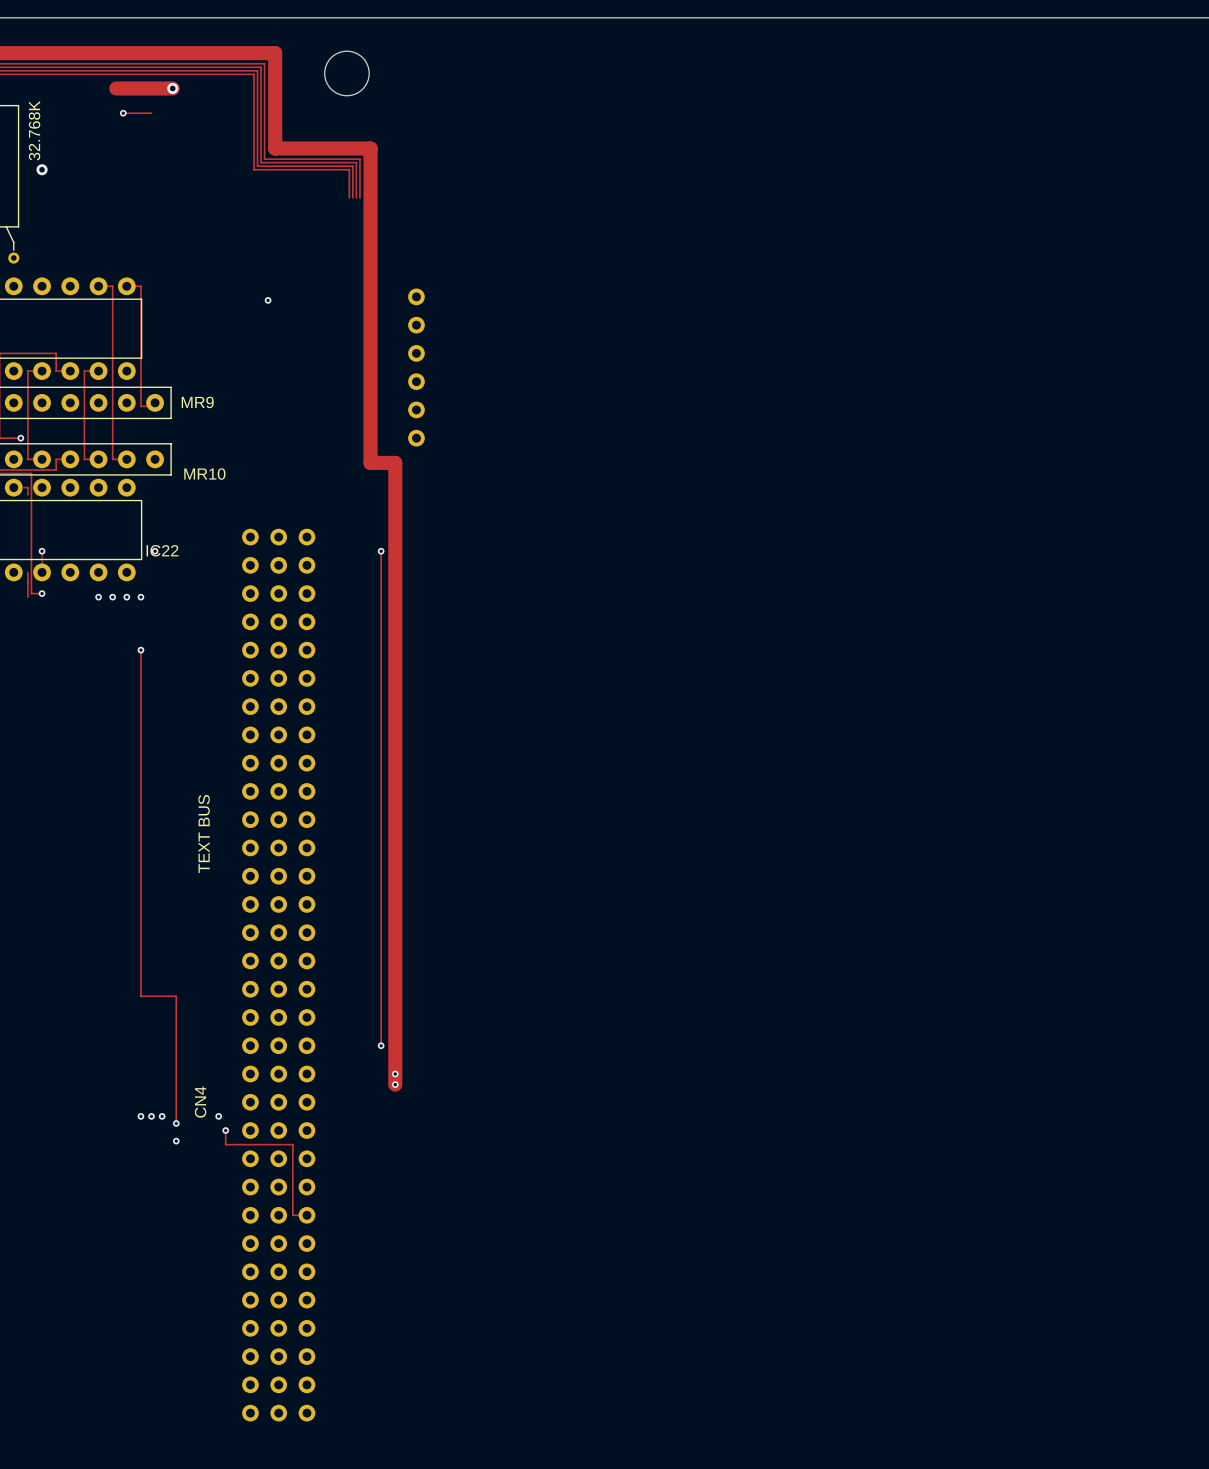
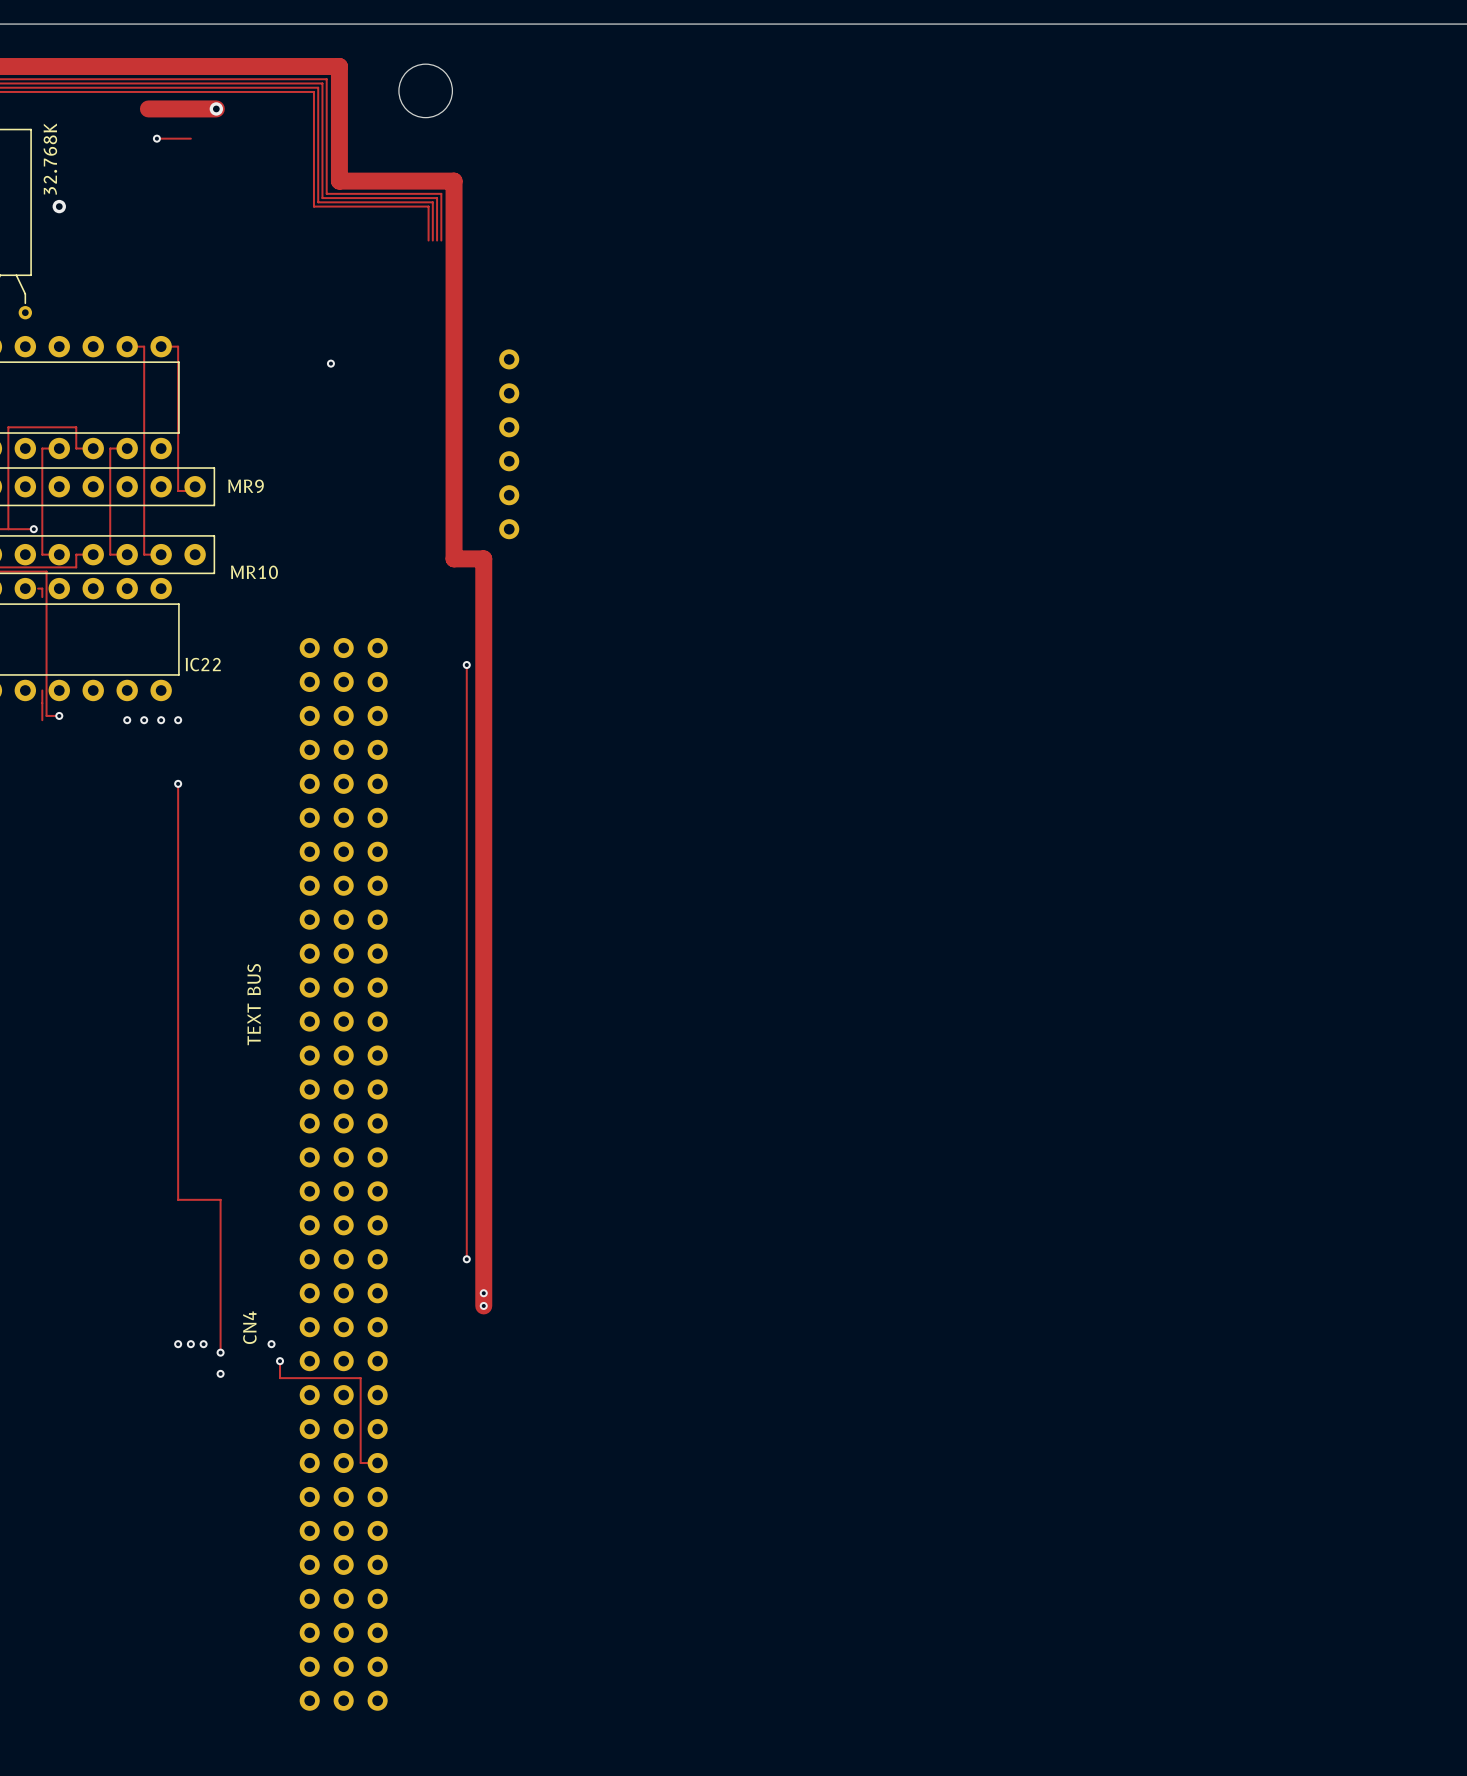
track: (42, 551) (42, 572) -> none
via: (42, 551) -> none
via: (155, 551) -> none

